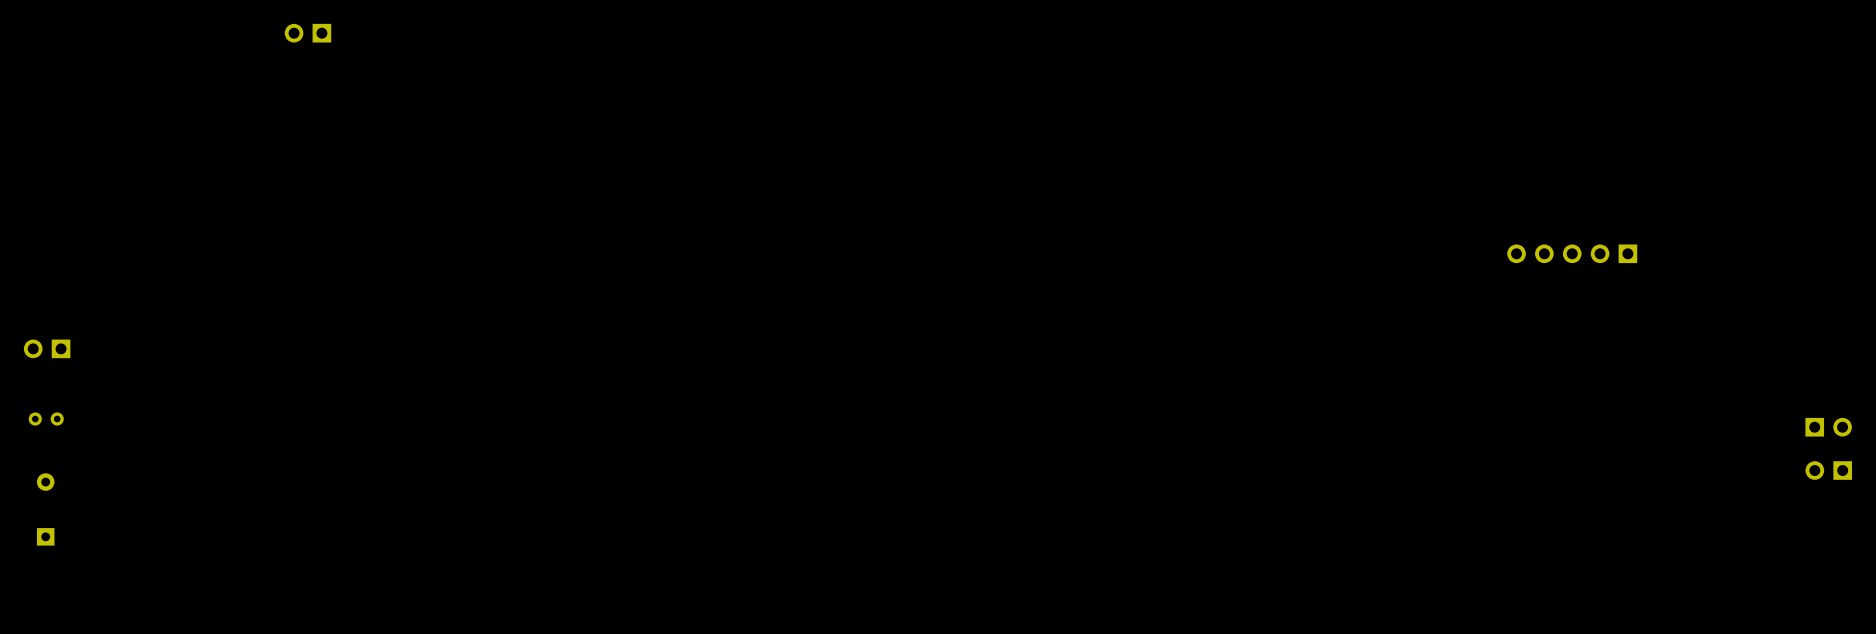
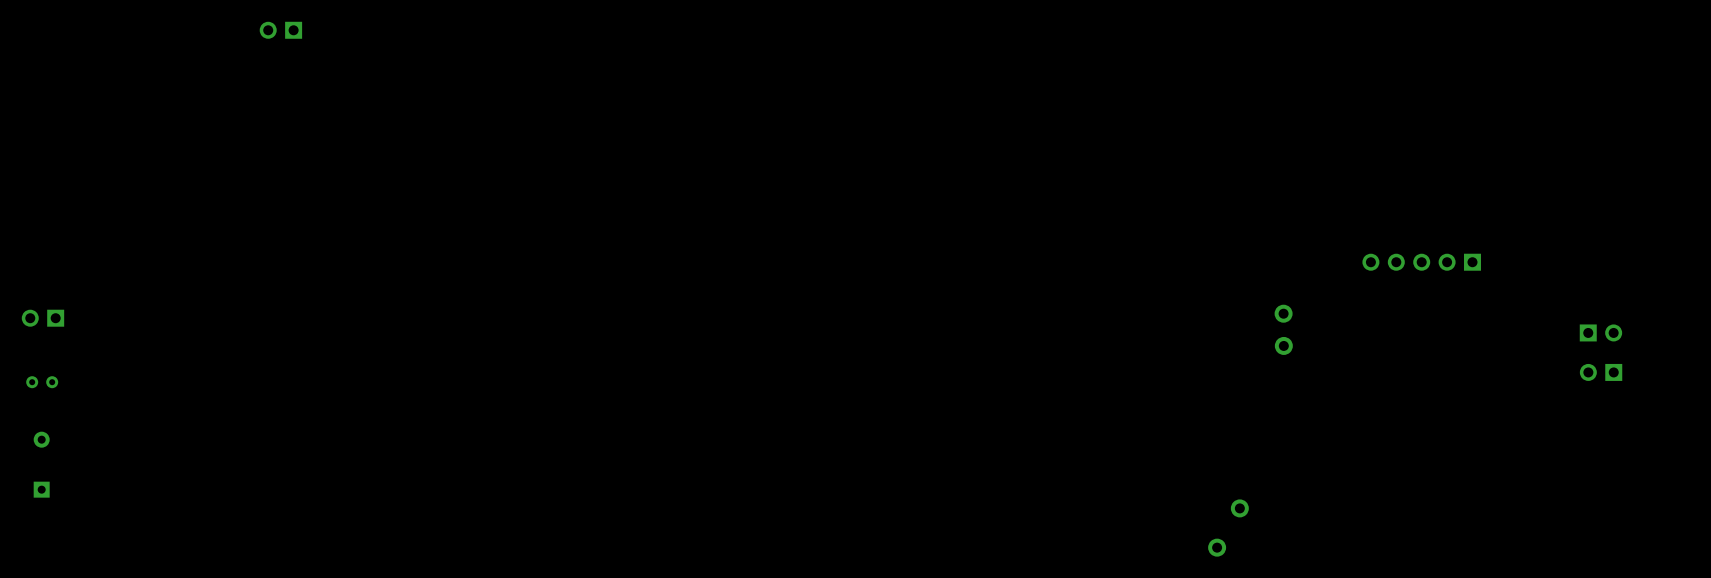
part position: (1572, 253) -> (1421, 262)
via: none -> (1283, 313)
part: none -> (1600, 332)
via: none -> (1283, 345)
part: none -> (1601, 372)
part: (1828, 427) -> none
part: (1828, 470) -> none
via: none -> (1239, 508)
via: none -> (1217, 547)

